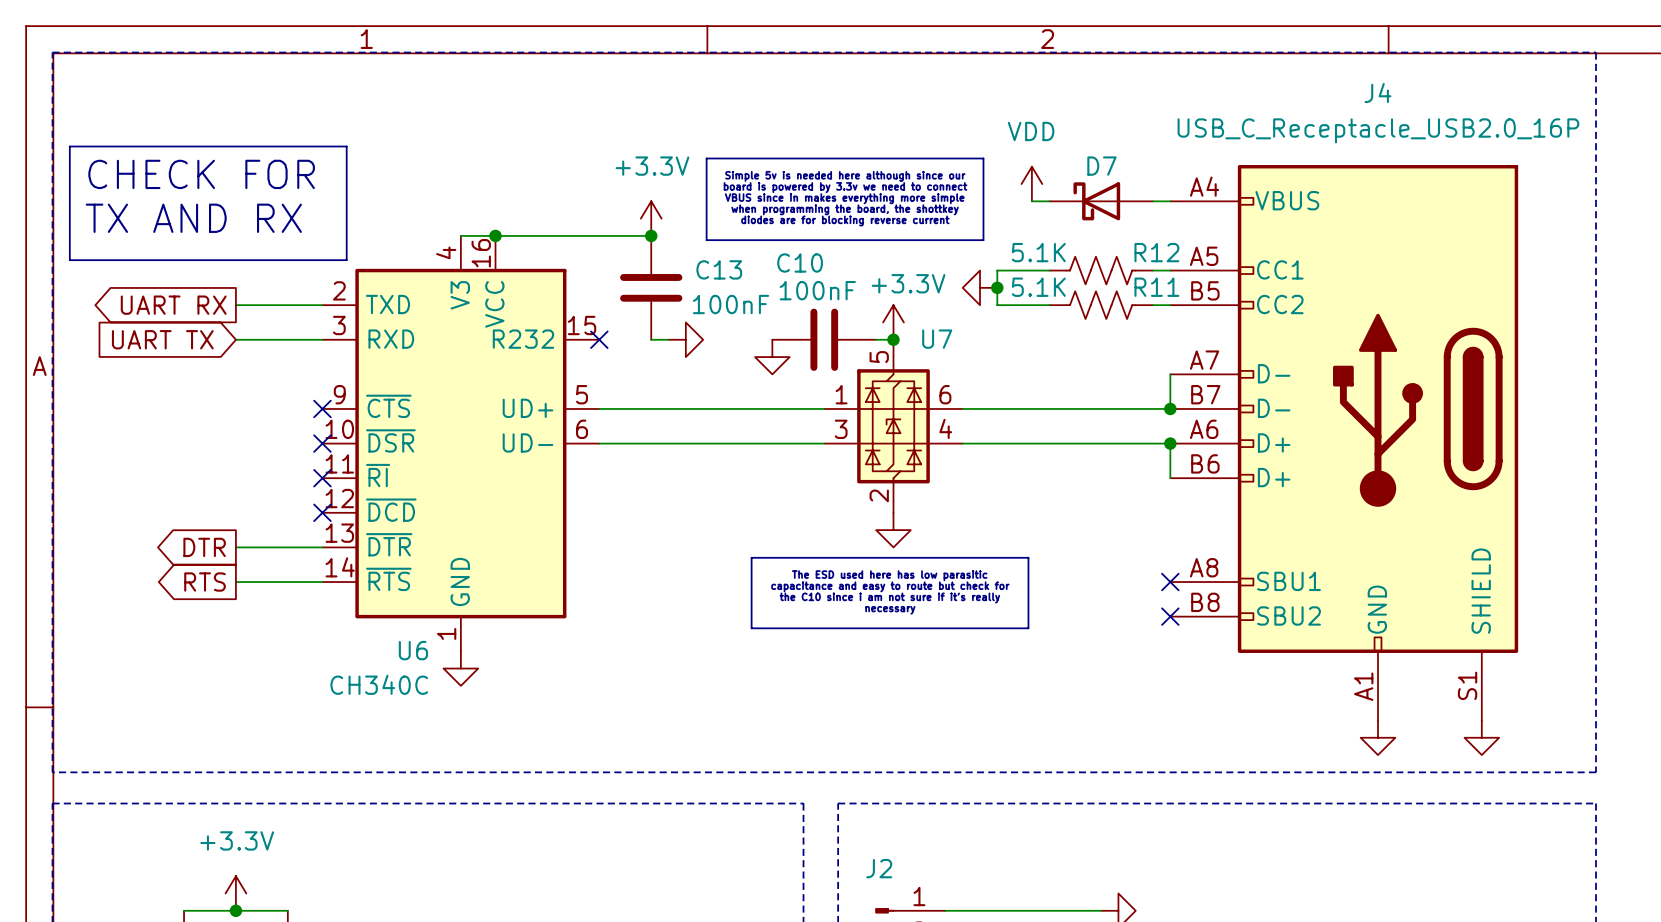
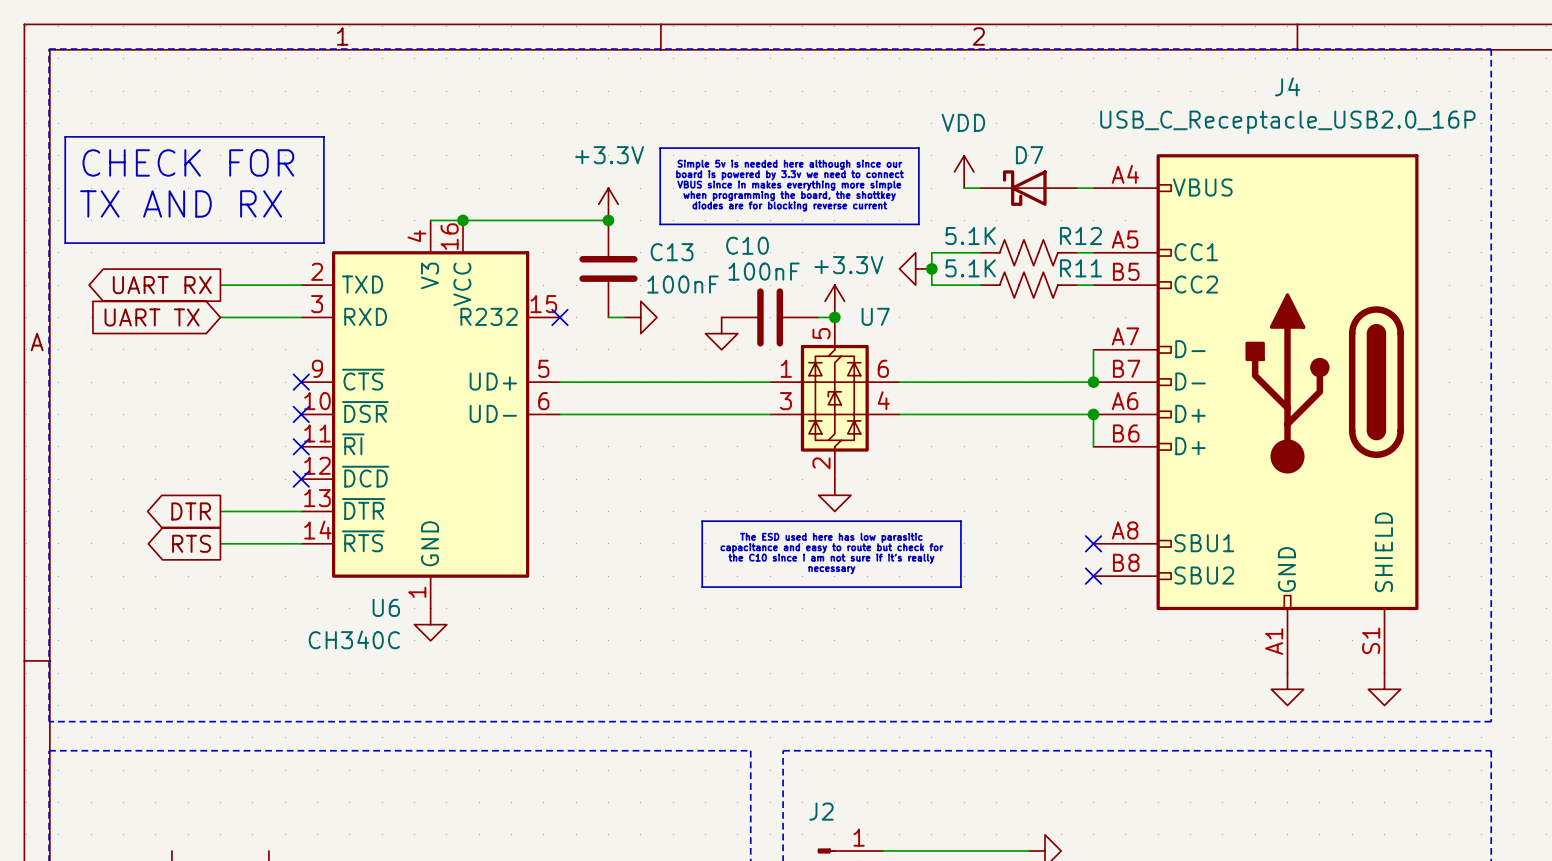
power symbol: +3.3V (235, 893) -> none
wire: (184, 910) (287, 910) -> none
junction: (235, 910) -> none

